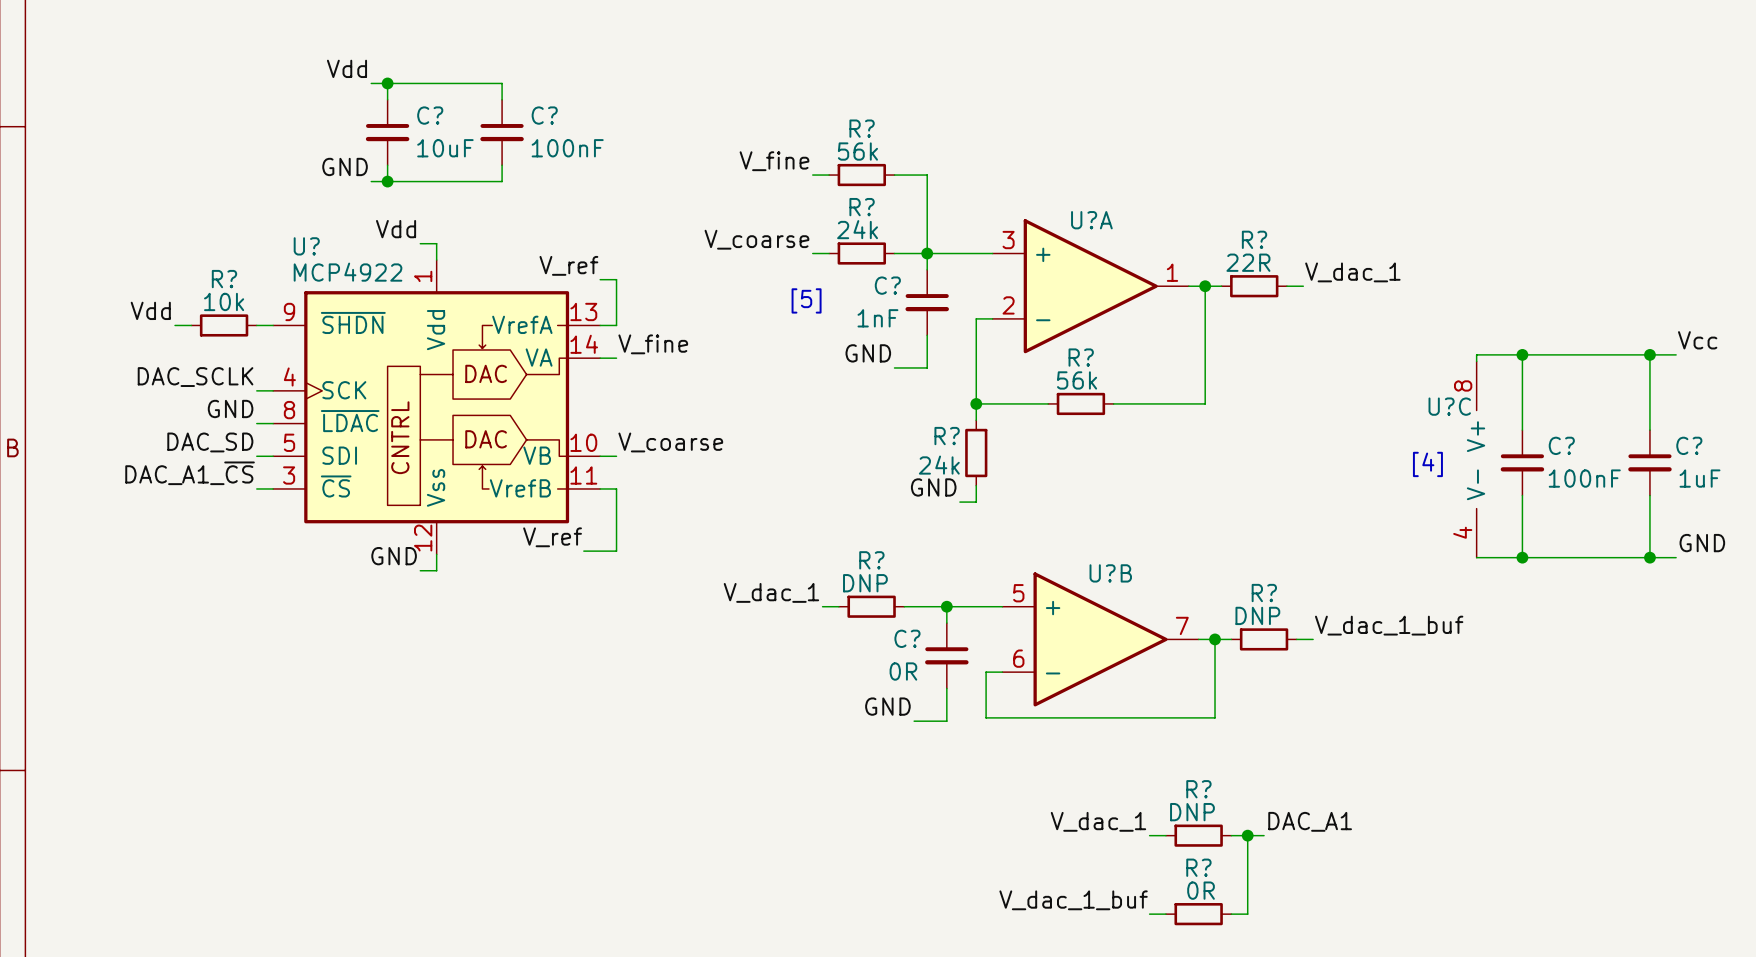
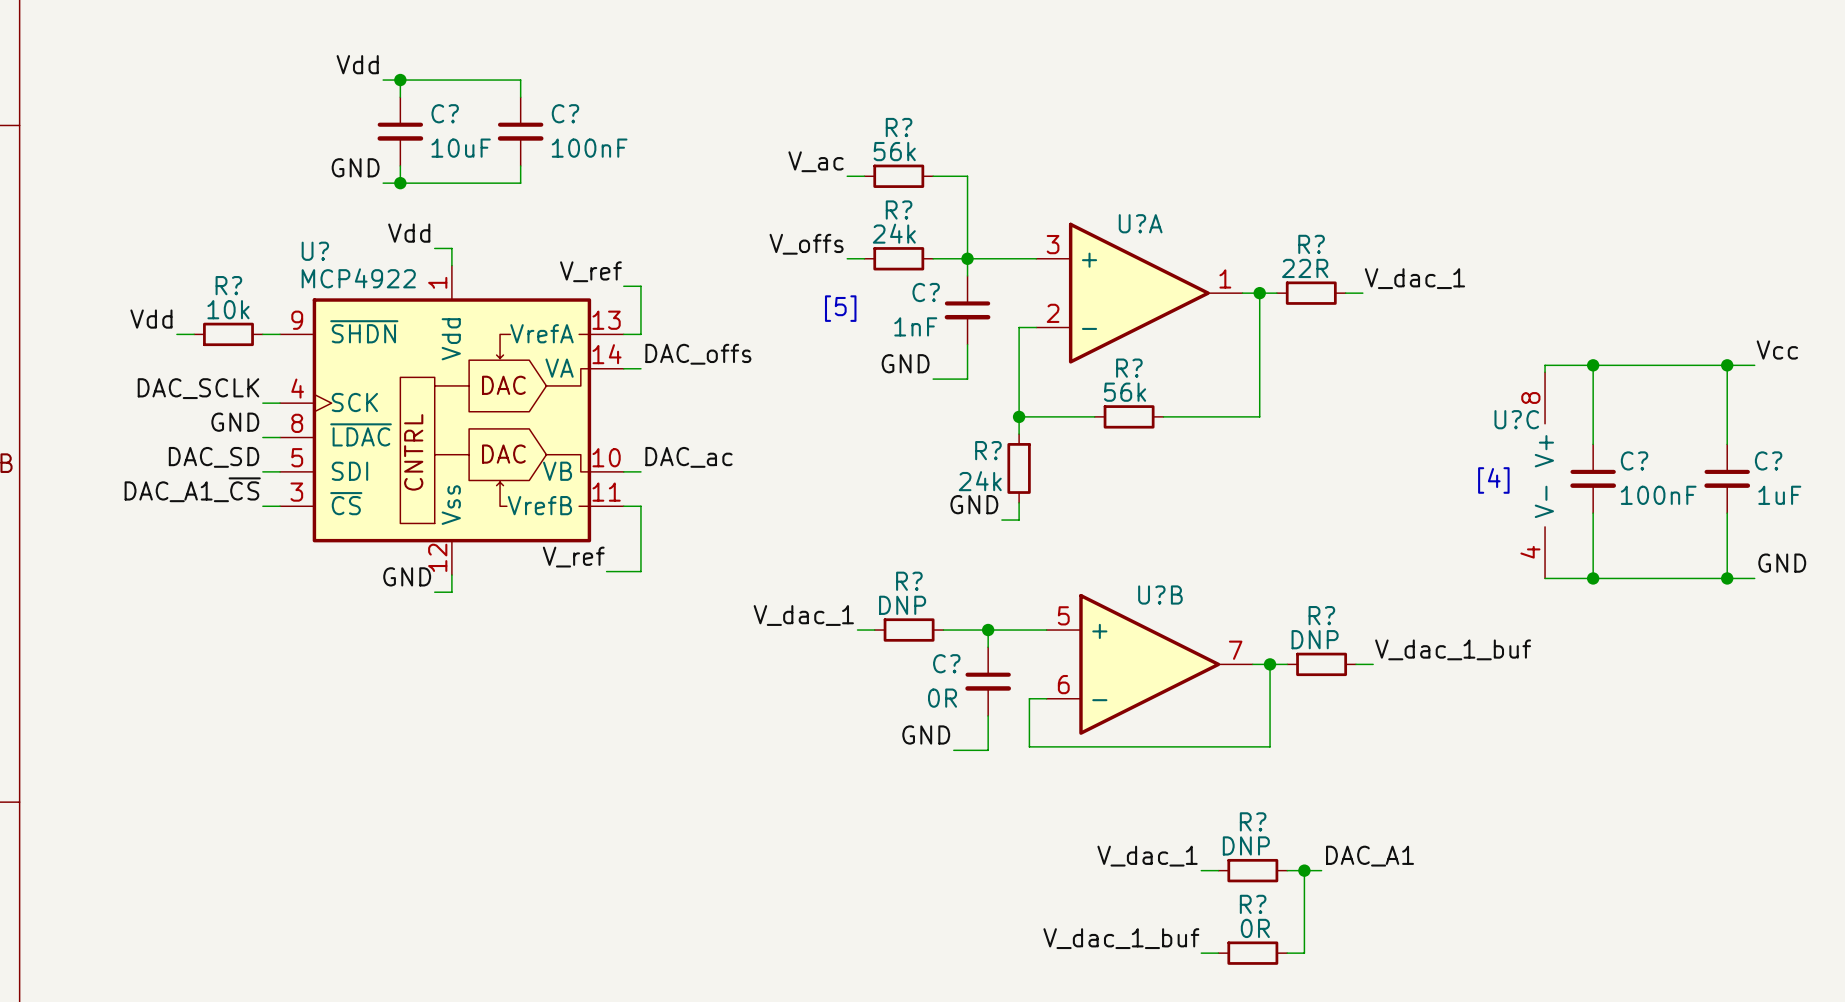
label: V_fine (774, 161) -> V_ac (815, 161)
label: V_coarse (756, 239) -> V_offs (806, 244)
label: V_fine (653, 344) -> DAC_offs (698, 354)
label: V_coarse (670, 442) -> DAC_ac (688, 457)

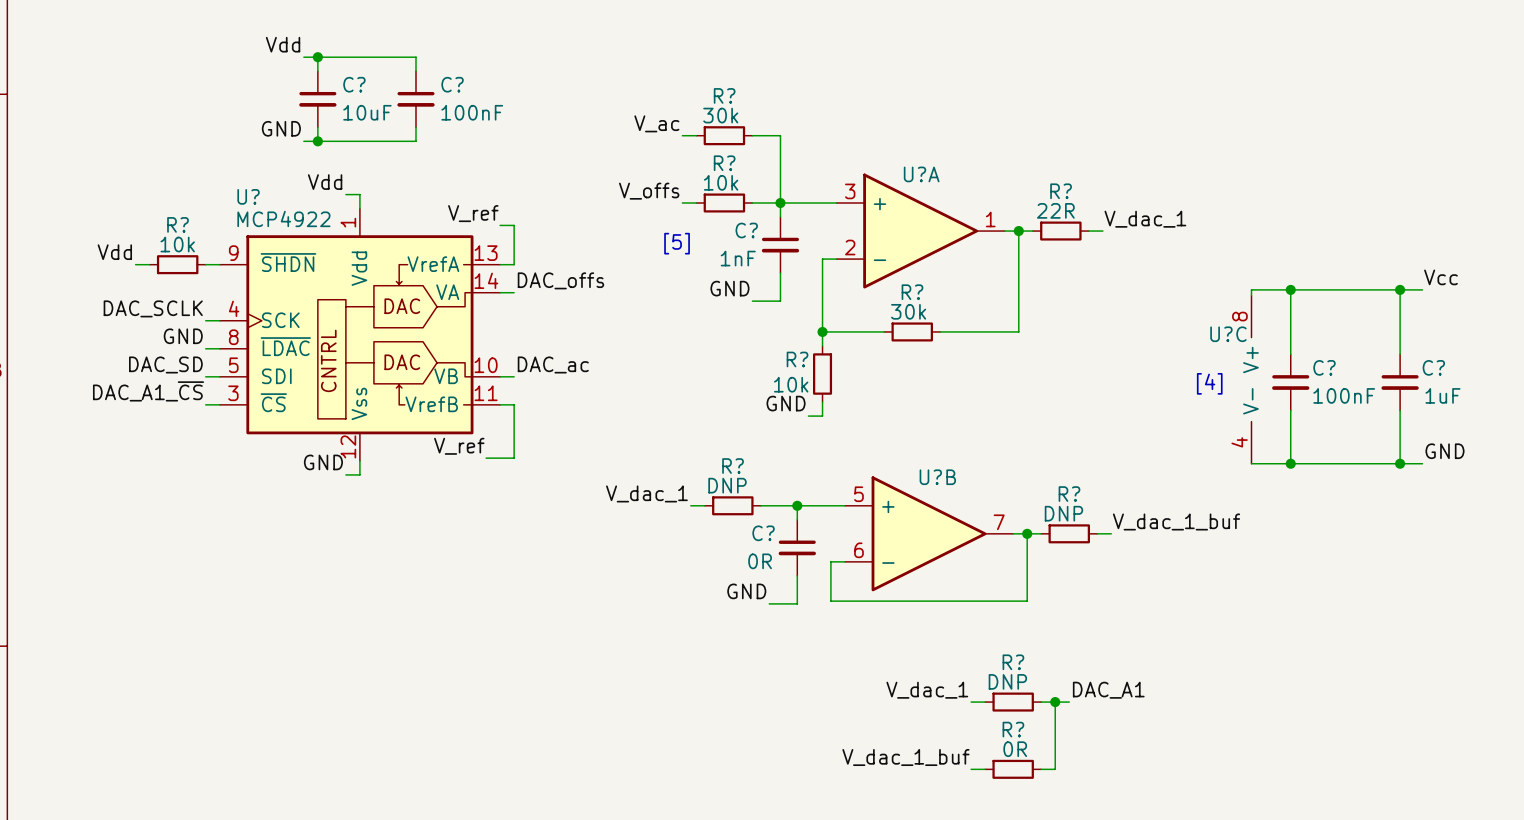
R? value: 56k (894, 151) -> 30k (720, 115)
R? value: 24k (894, 233) -> 10k (721, 182)
R? value: 56k (1125, 392) -> 30k (908, 311)
R? value: 24k (980, 481) -> 10k (791, 384)

